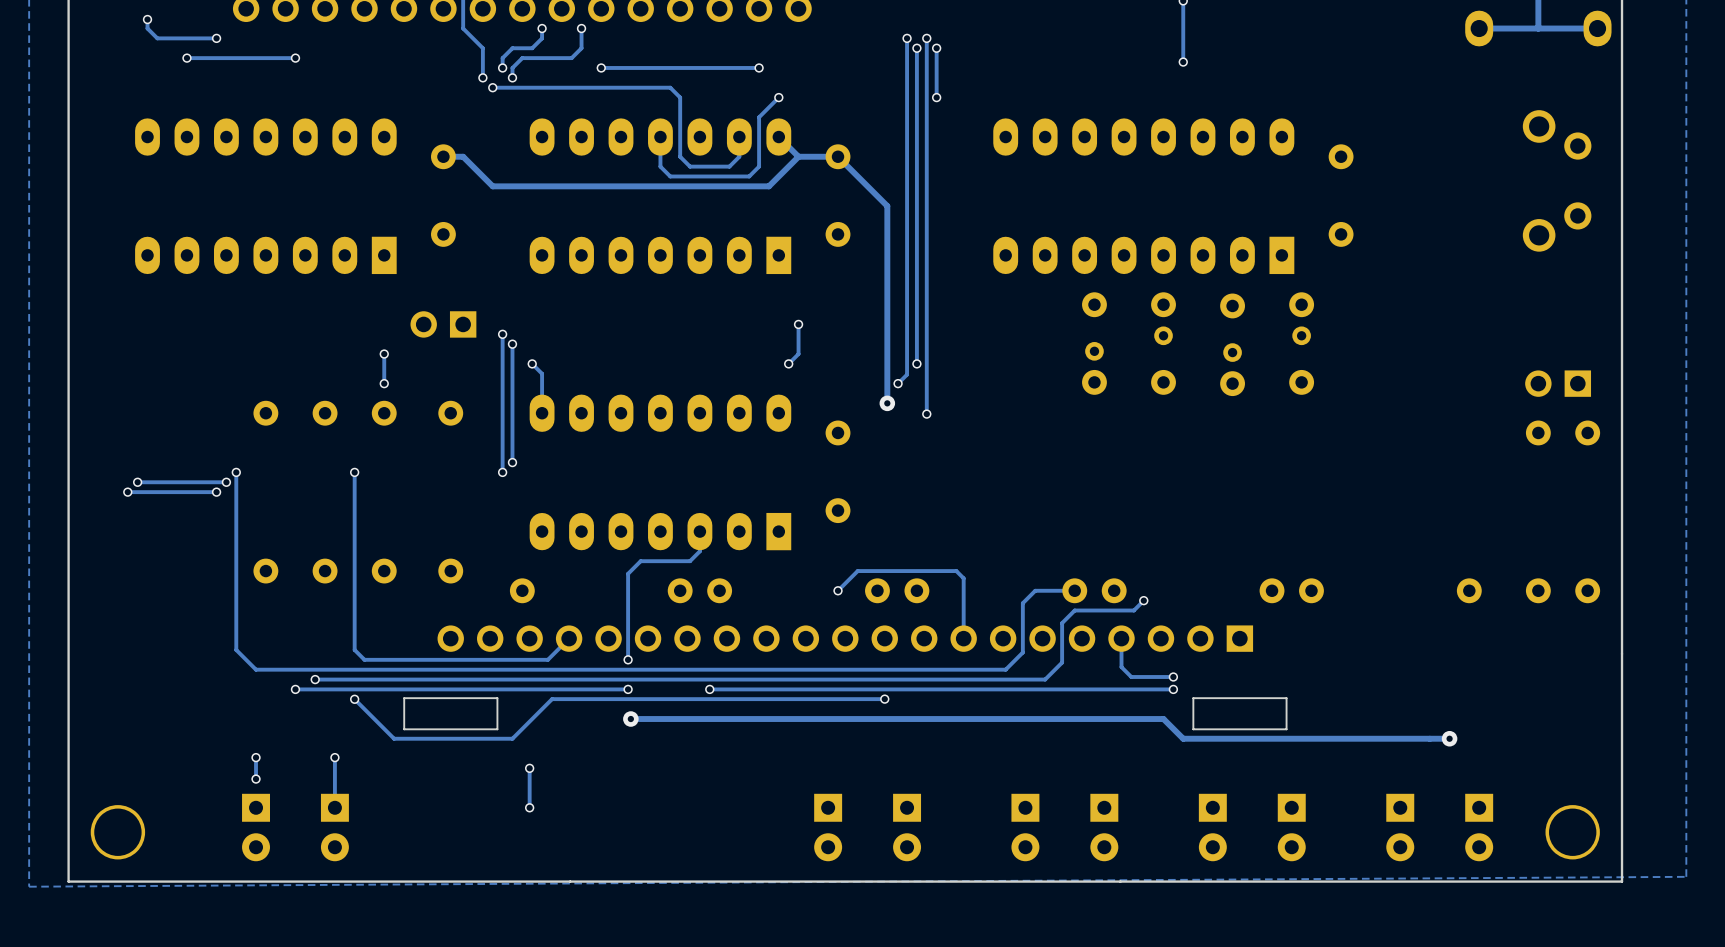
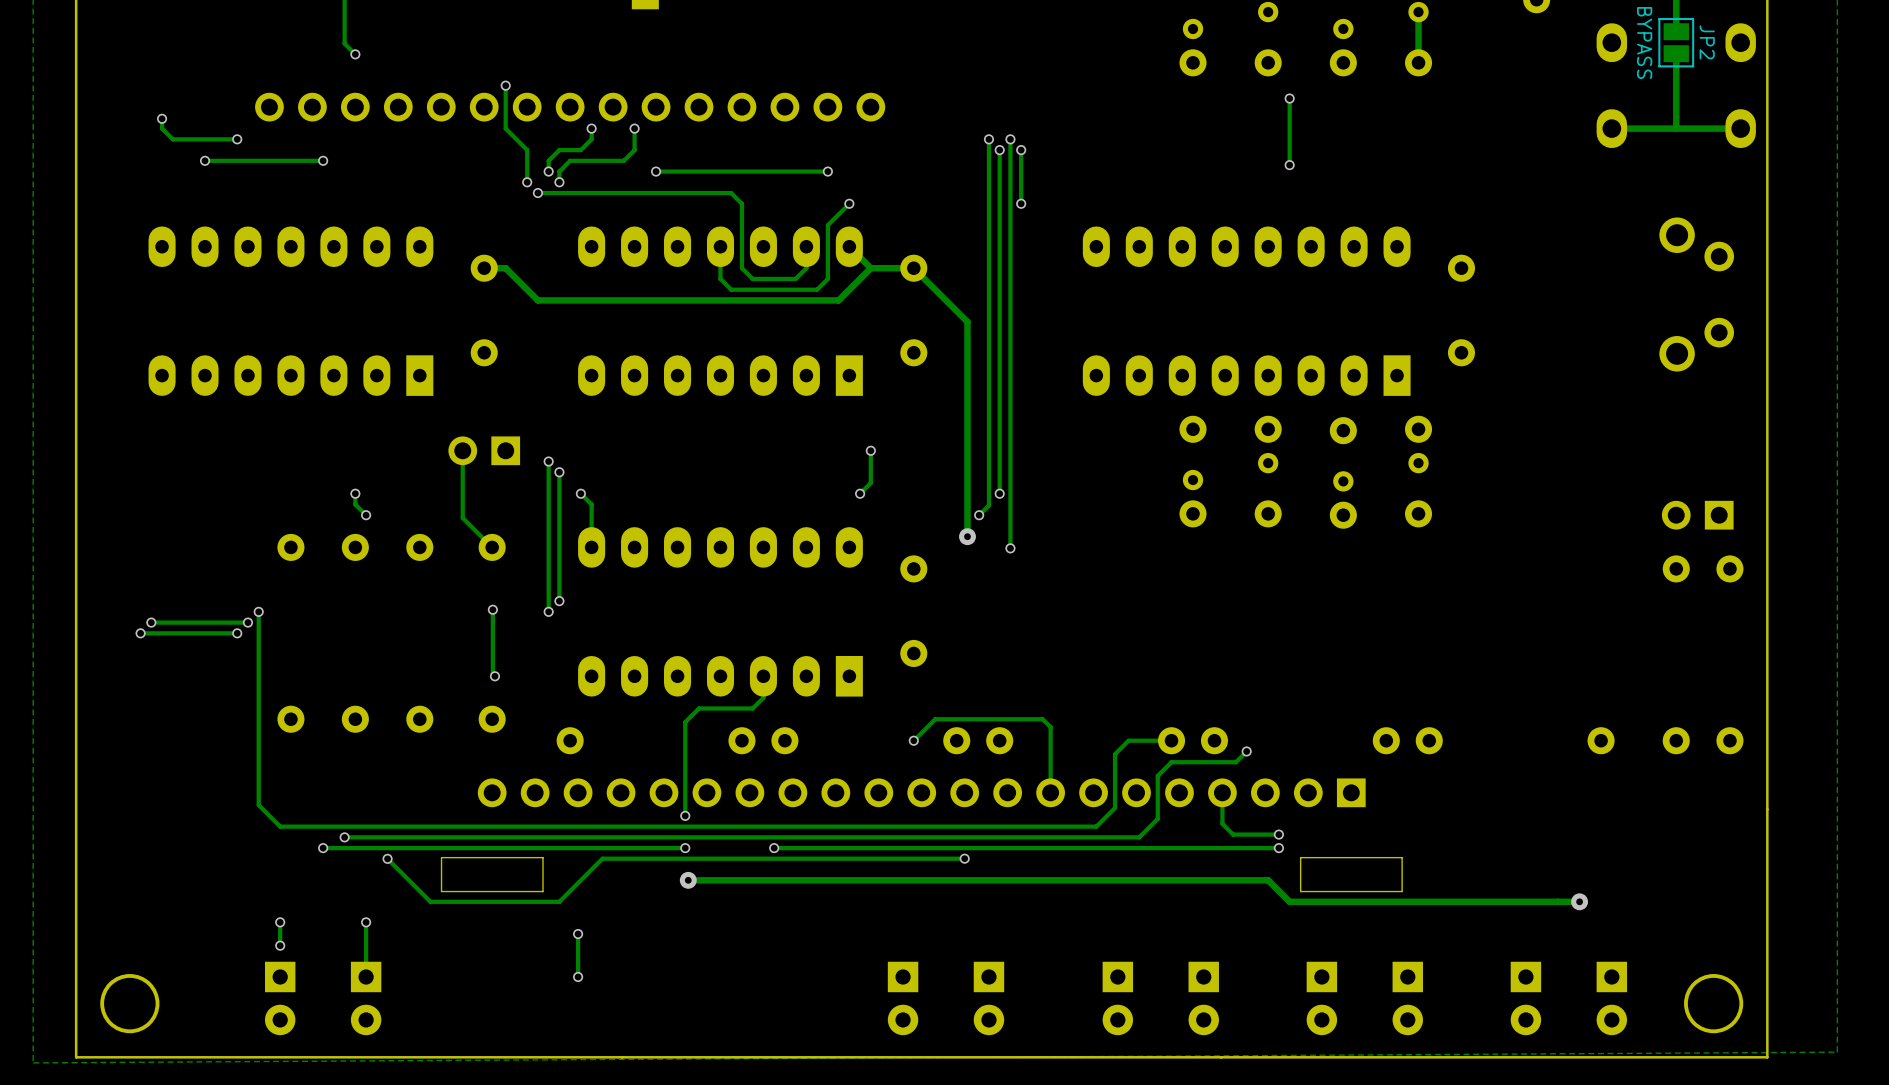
track: none -> (462, 450) (462, 517) (492, 547)
track: (384, 354) (384, 383) -> none
via: (384, 354) -> none
track: none -> (355, 493) (355, 504) (366, 515)
via: none -> (355, 493)
via: none -> (366, 515)
via: (384, 383) -> none
track: none -> (492, 609) (492, 674) (494, 676)
via: none -> (492, 609)
track: (354, 472) (354, 649) (364, 659) (547, 659) (569, 638) -> none
via: (354, 472) -> none
via: none -> (494, 676)

